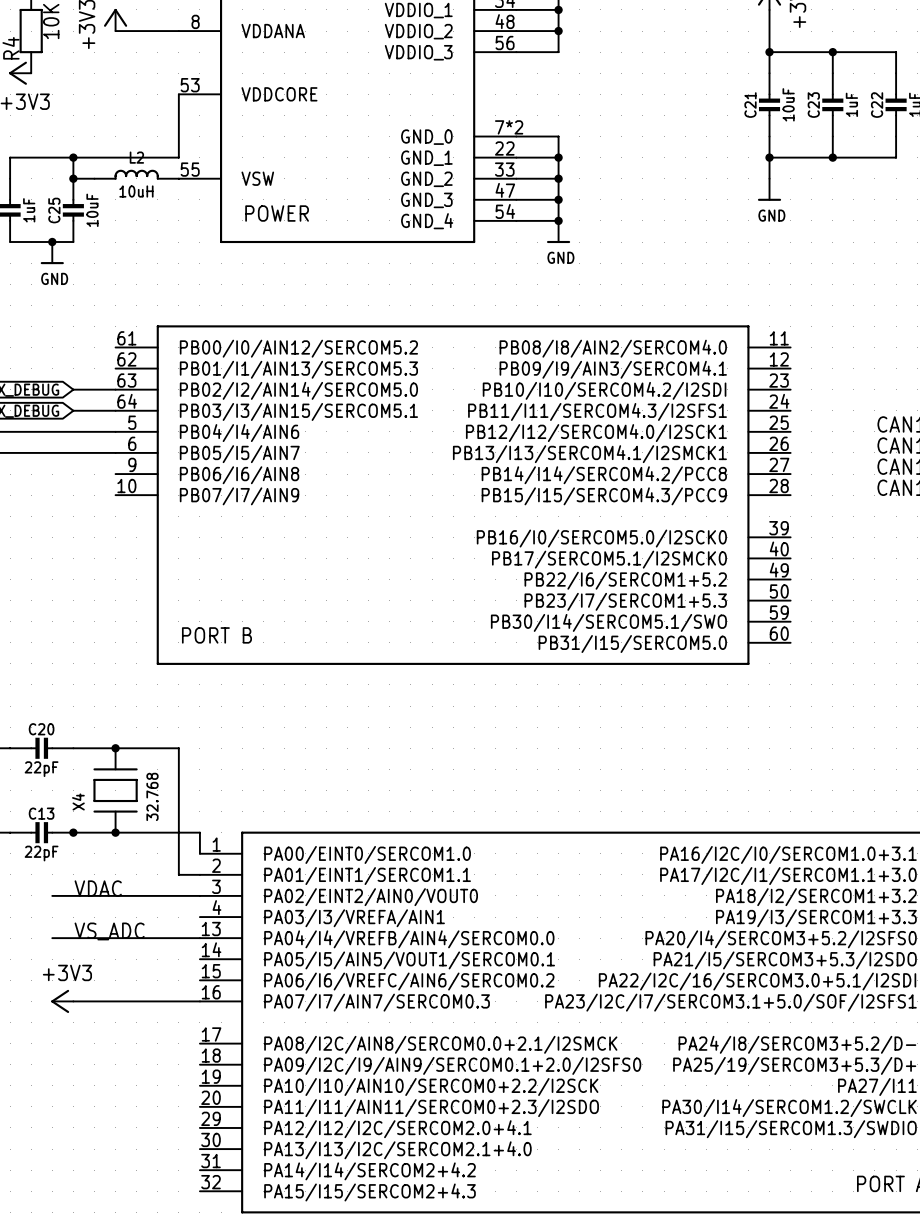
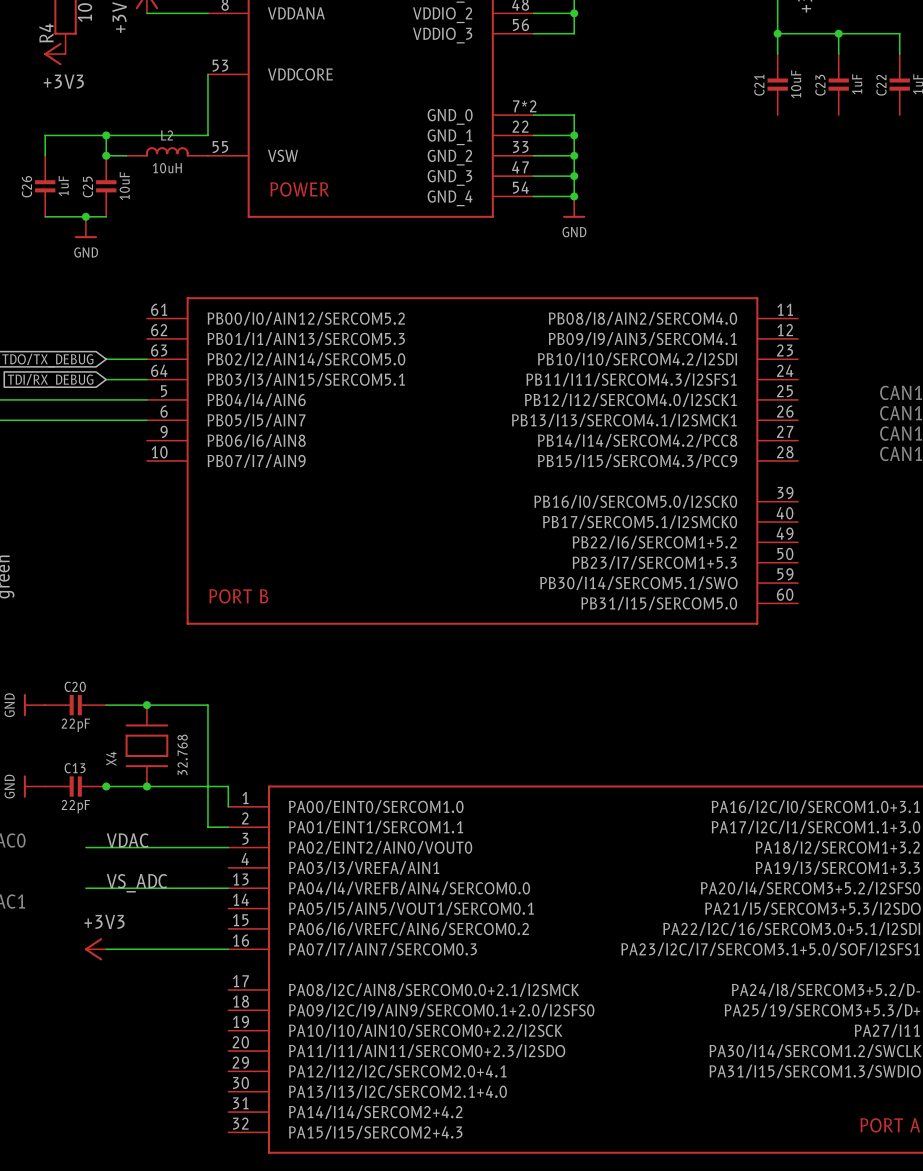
wire: (769, 136) (769, 178) -> none
wire: (832, 136) (832, 157) -> none
wire: (896, 136) (896, 157) (769, 157) -> none
junction: (769, 157) -> none
junction: (832, 157) -> none
power symbol: GND (769, 189) -> none

